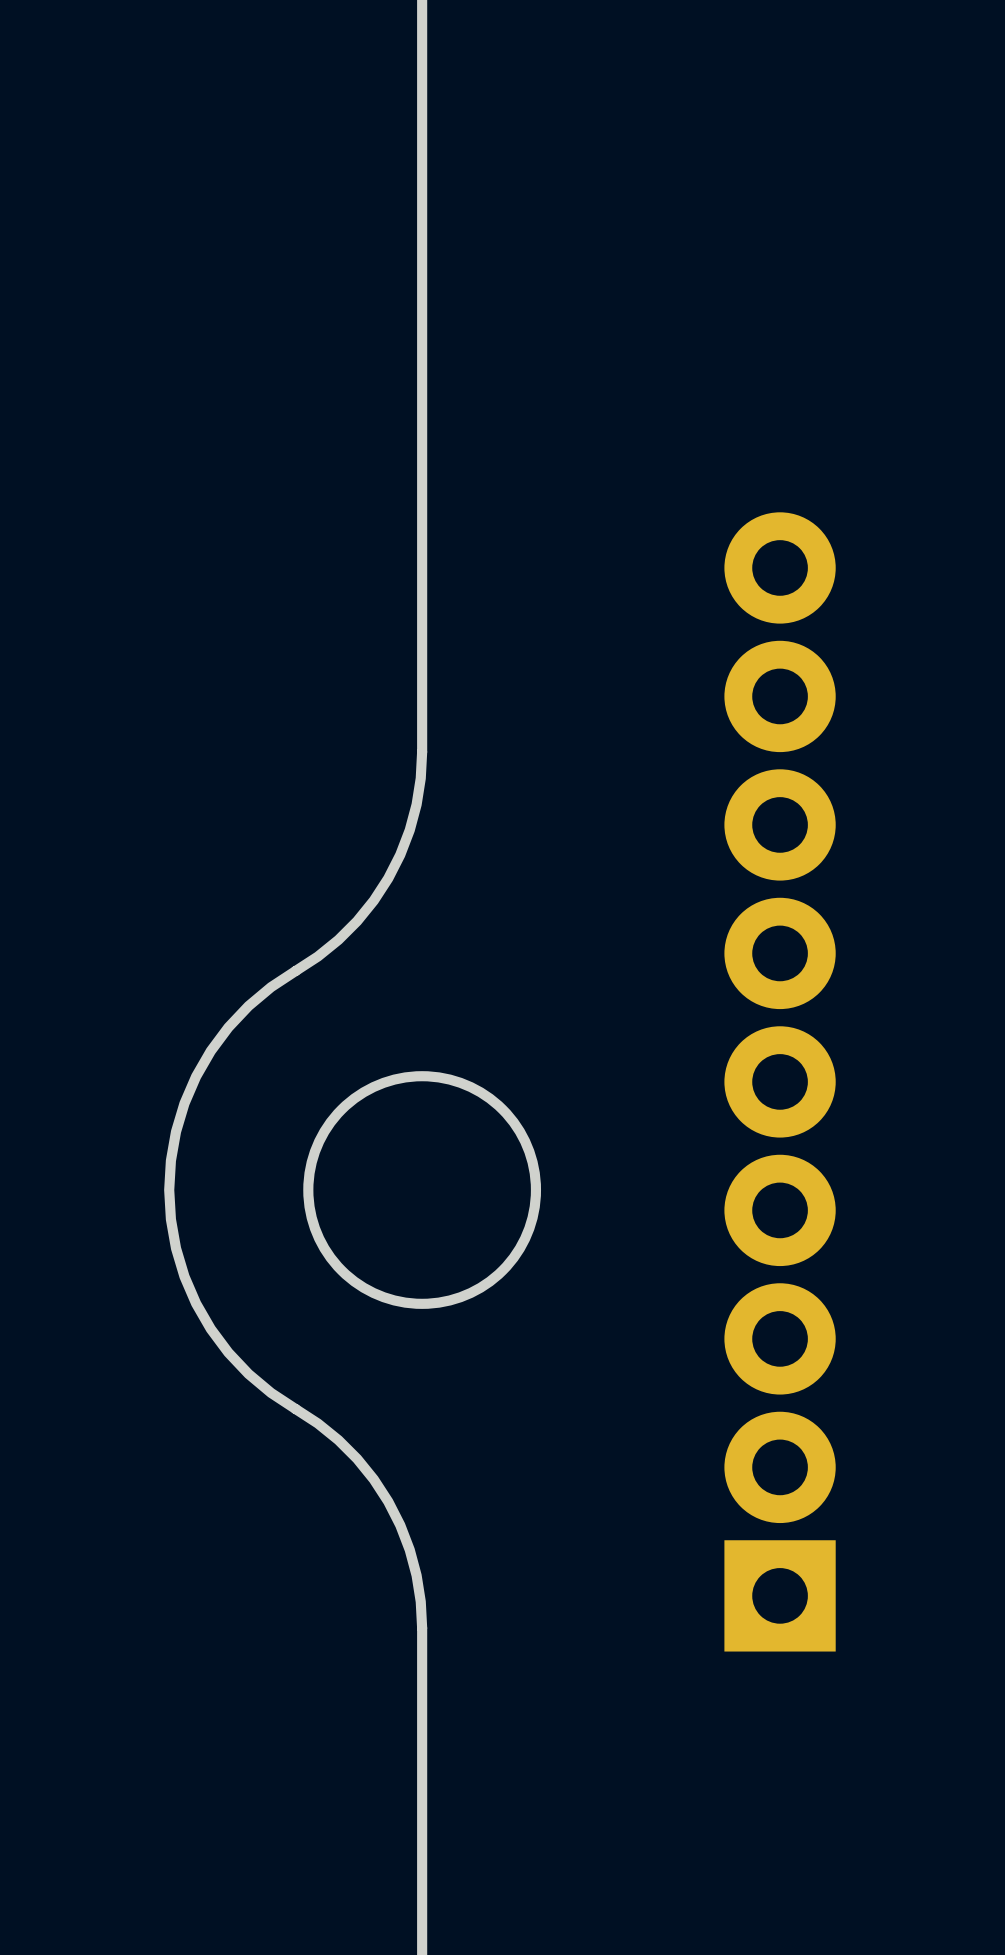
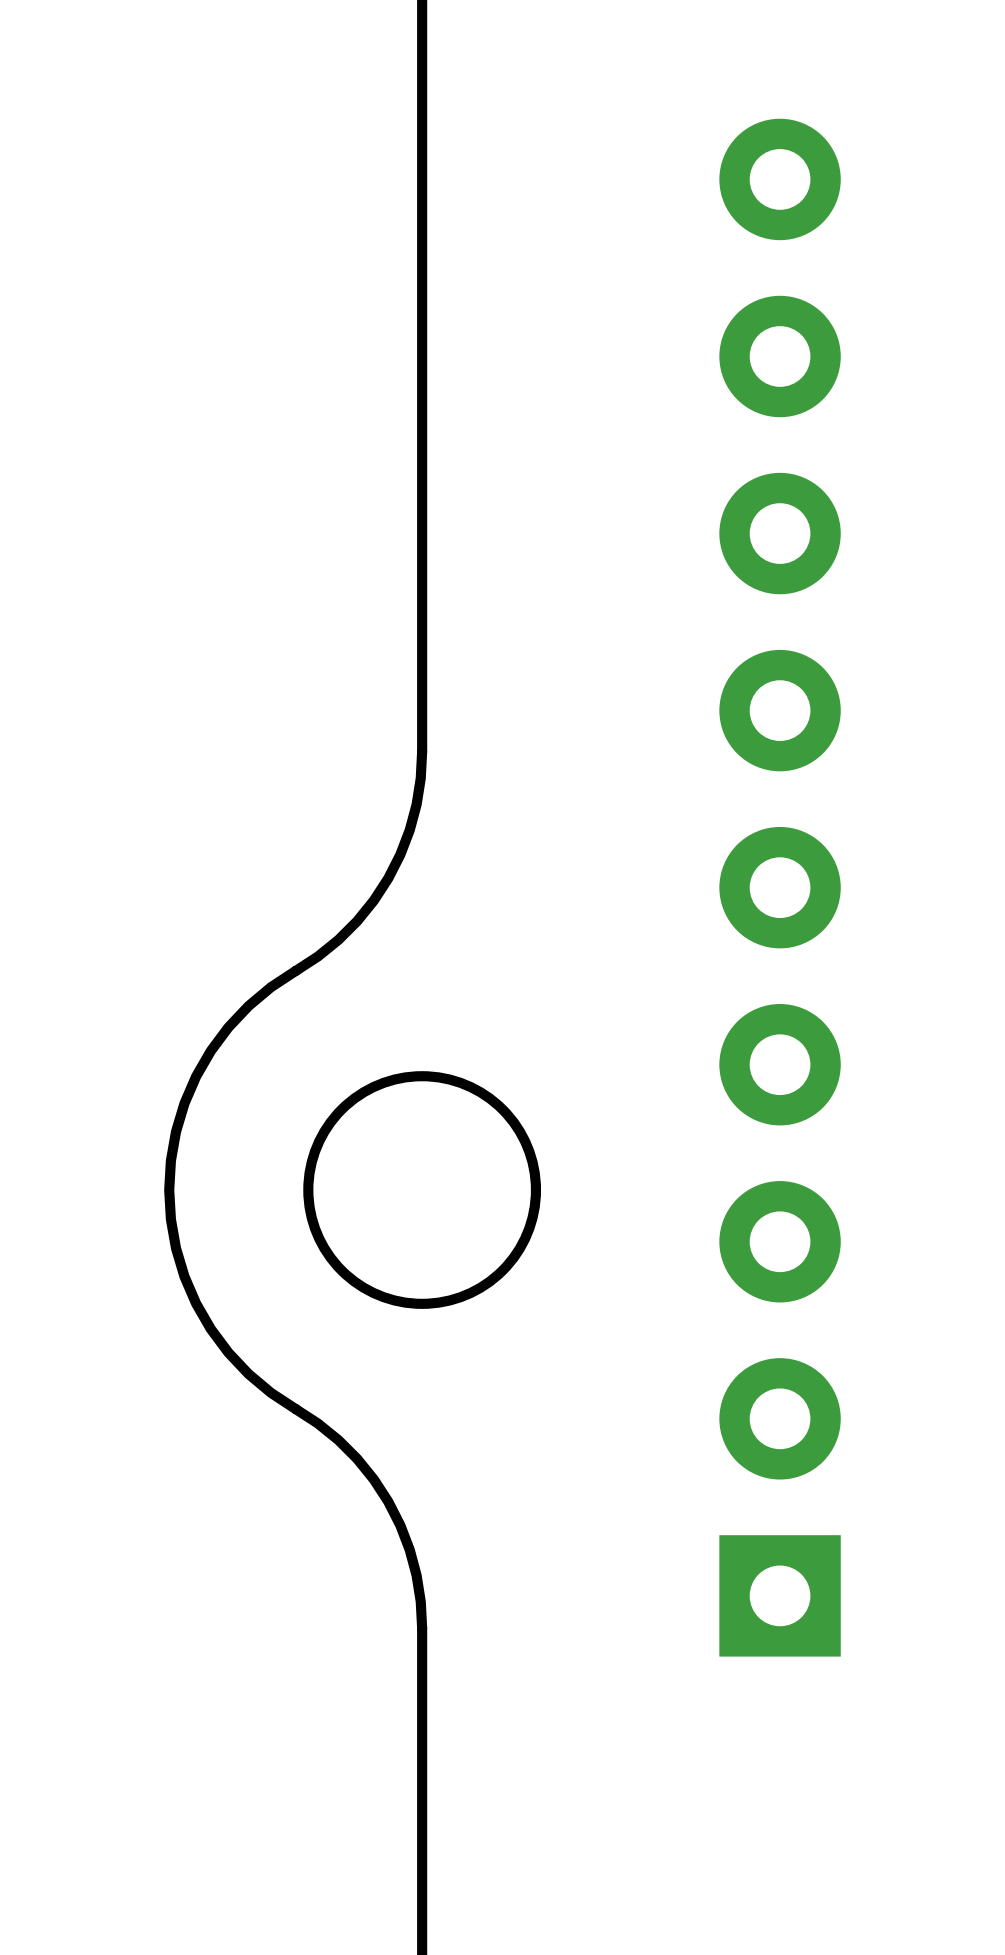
part: none -> (780, 887)
part: (780, 1081) -> none

